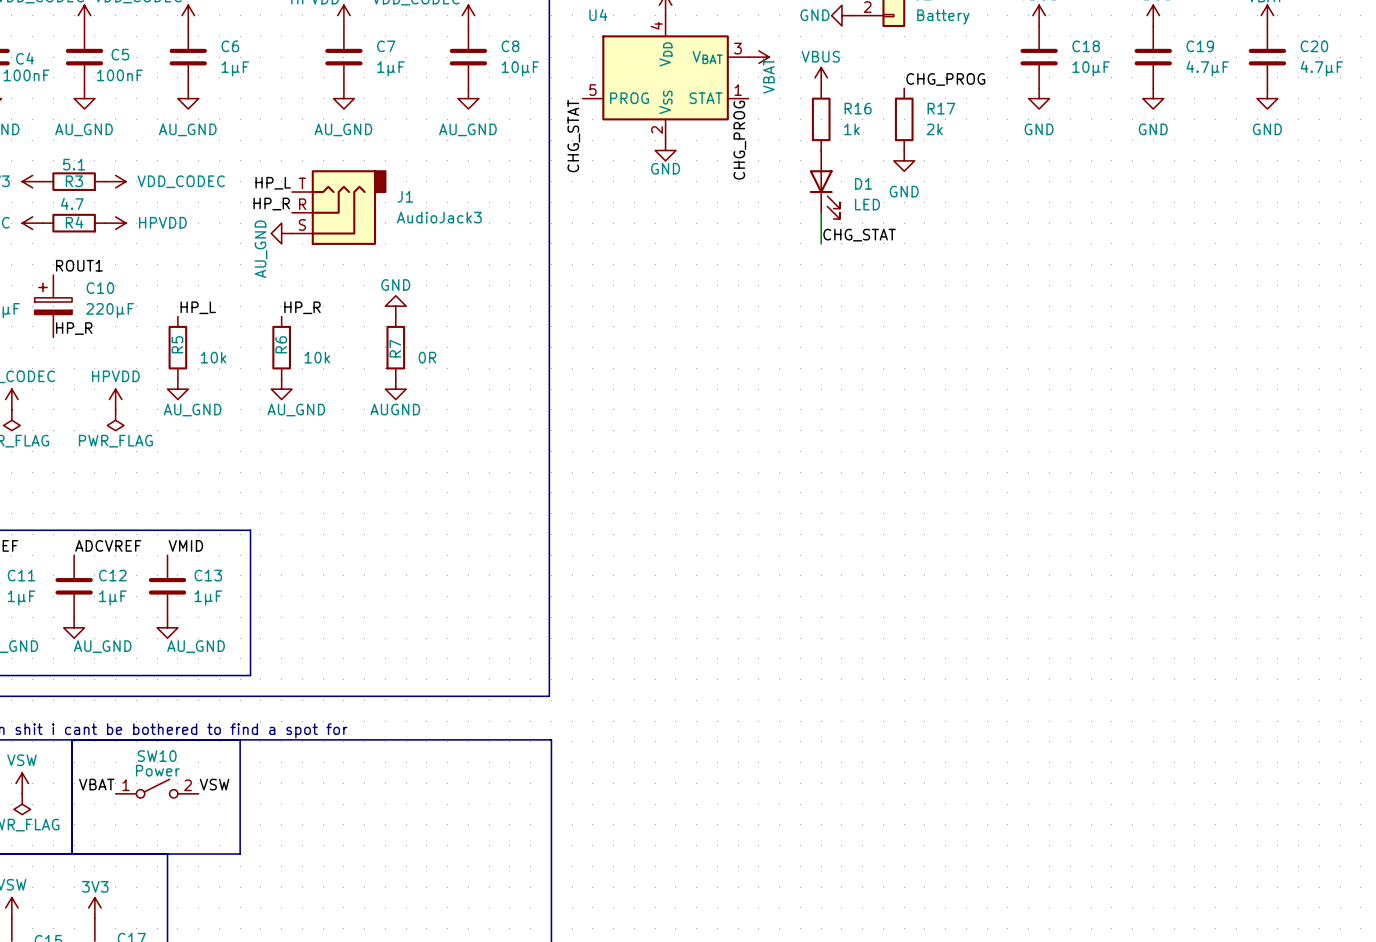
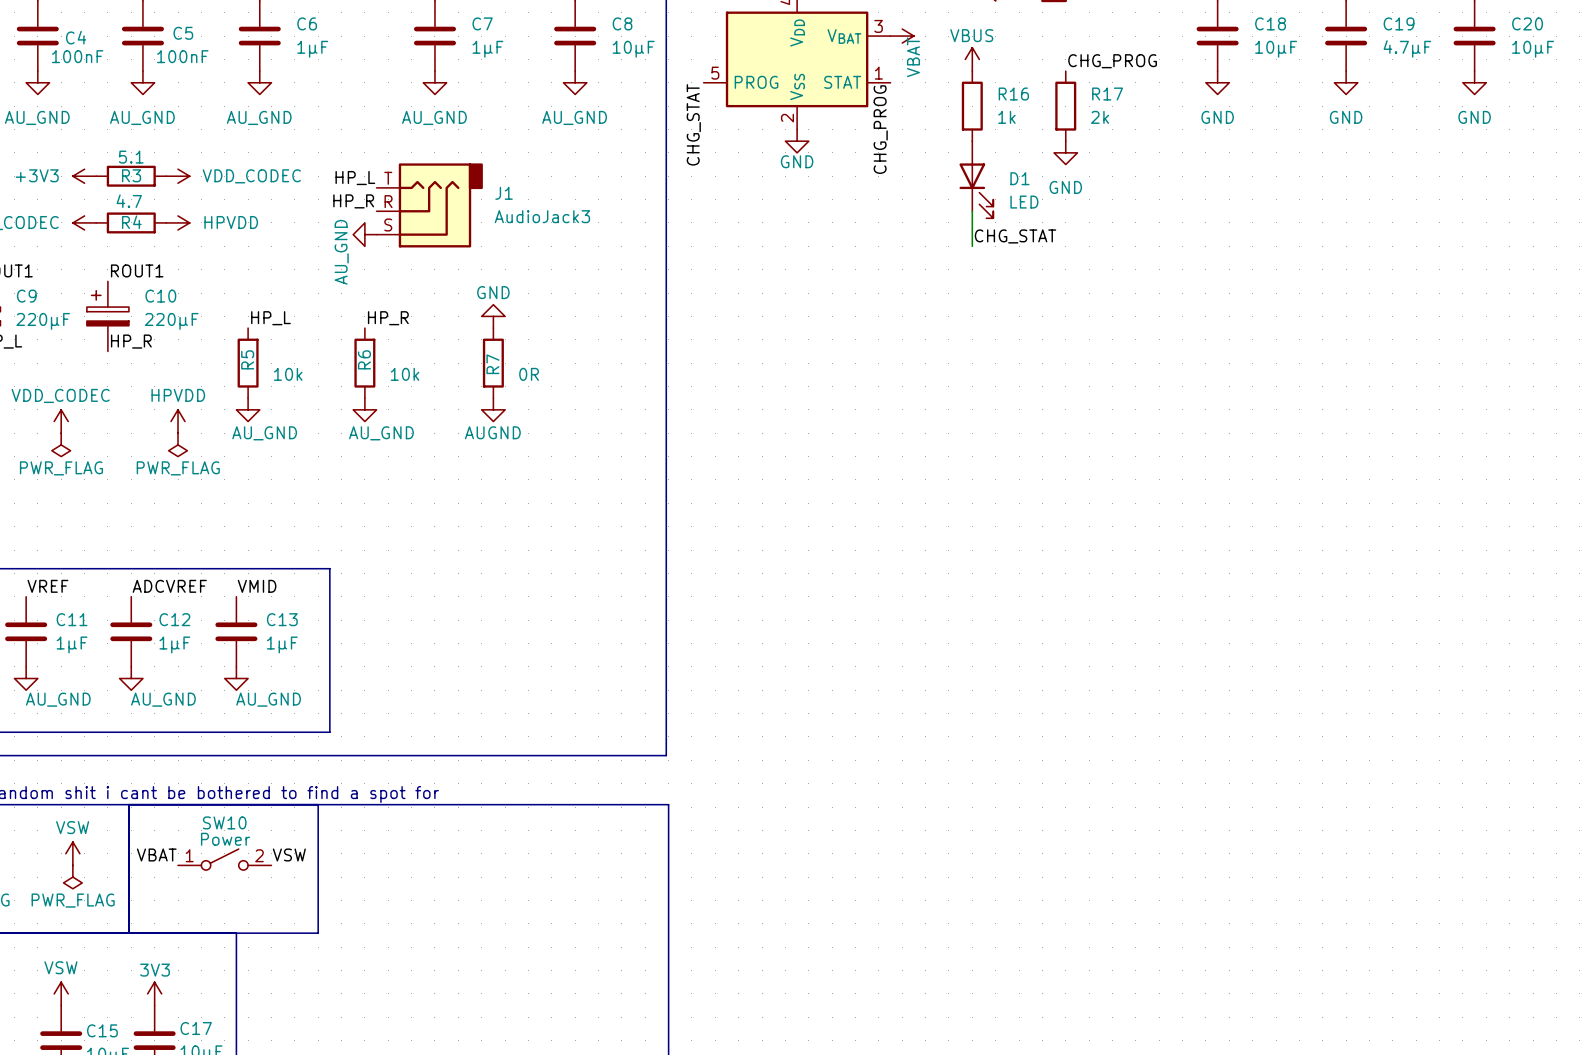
C20 value: 4.7μF (1321, 68) -> 10μF (1533, 49)

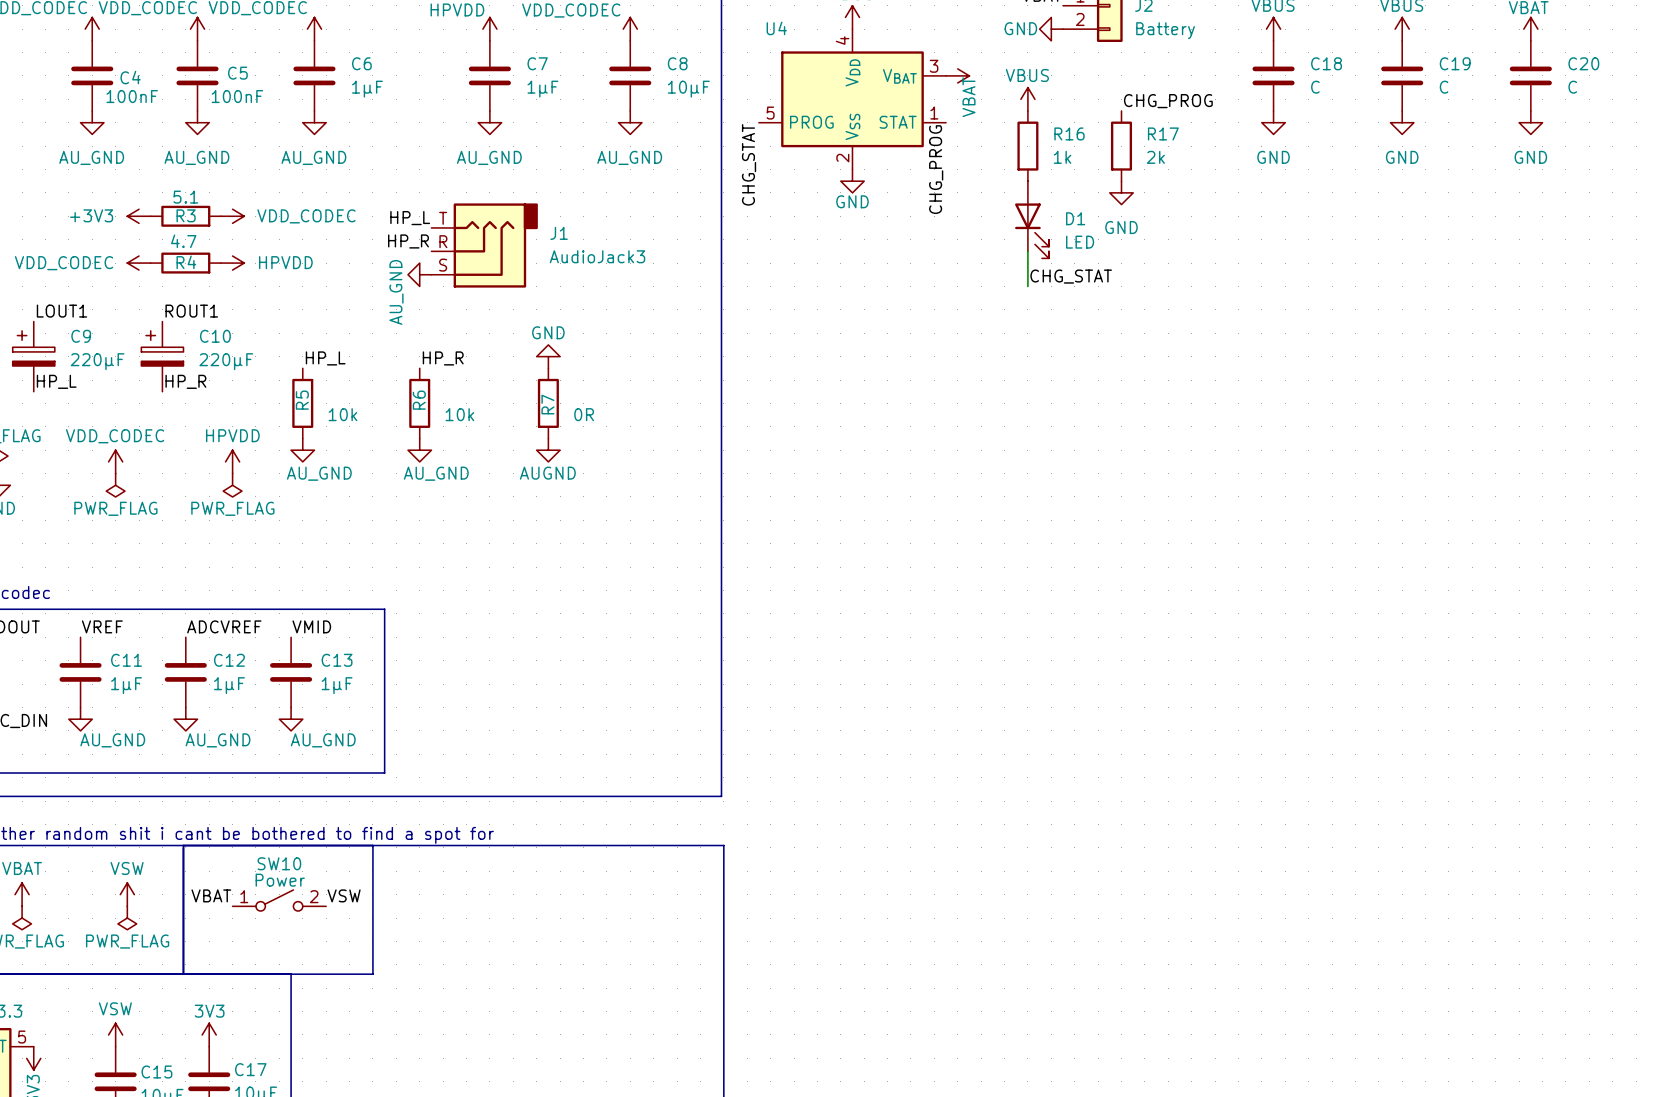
C19 value: 4.7μF (1407, 48) -> C (1444, 87)
C18 value: 10μF (1276, 49) -> C (1315, 87)
C20 value: 10μF (1533, 49) -> C (1572, 87)

